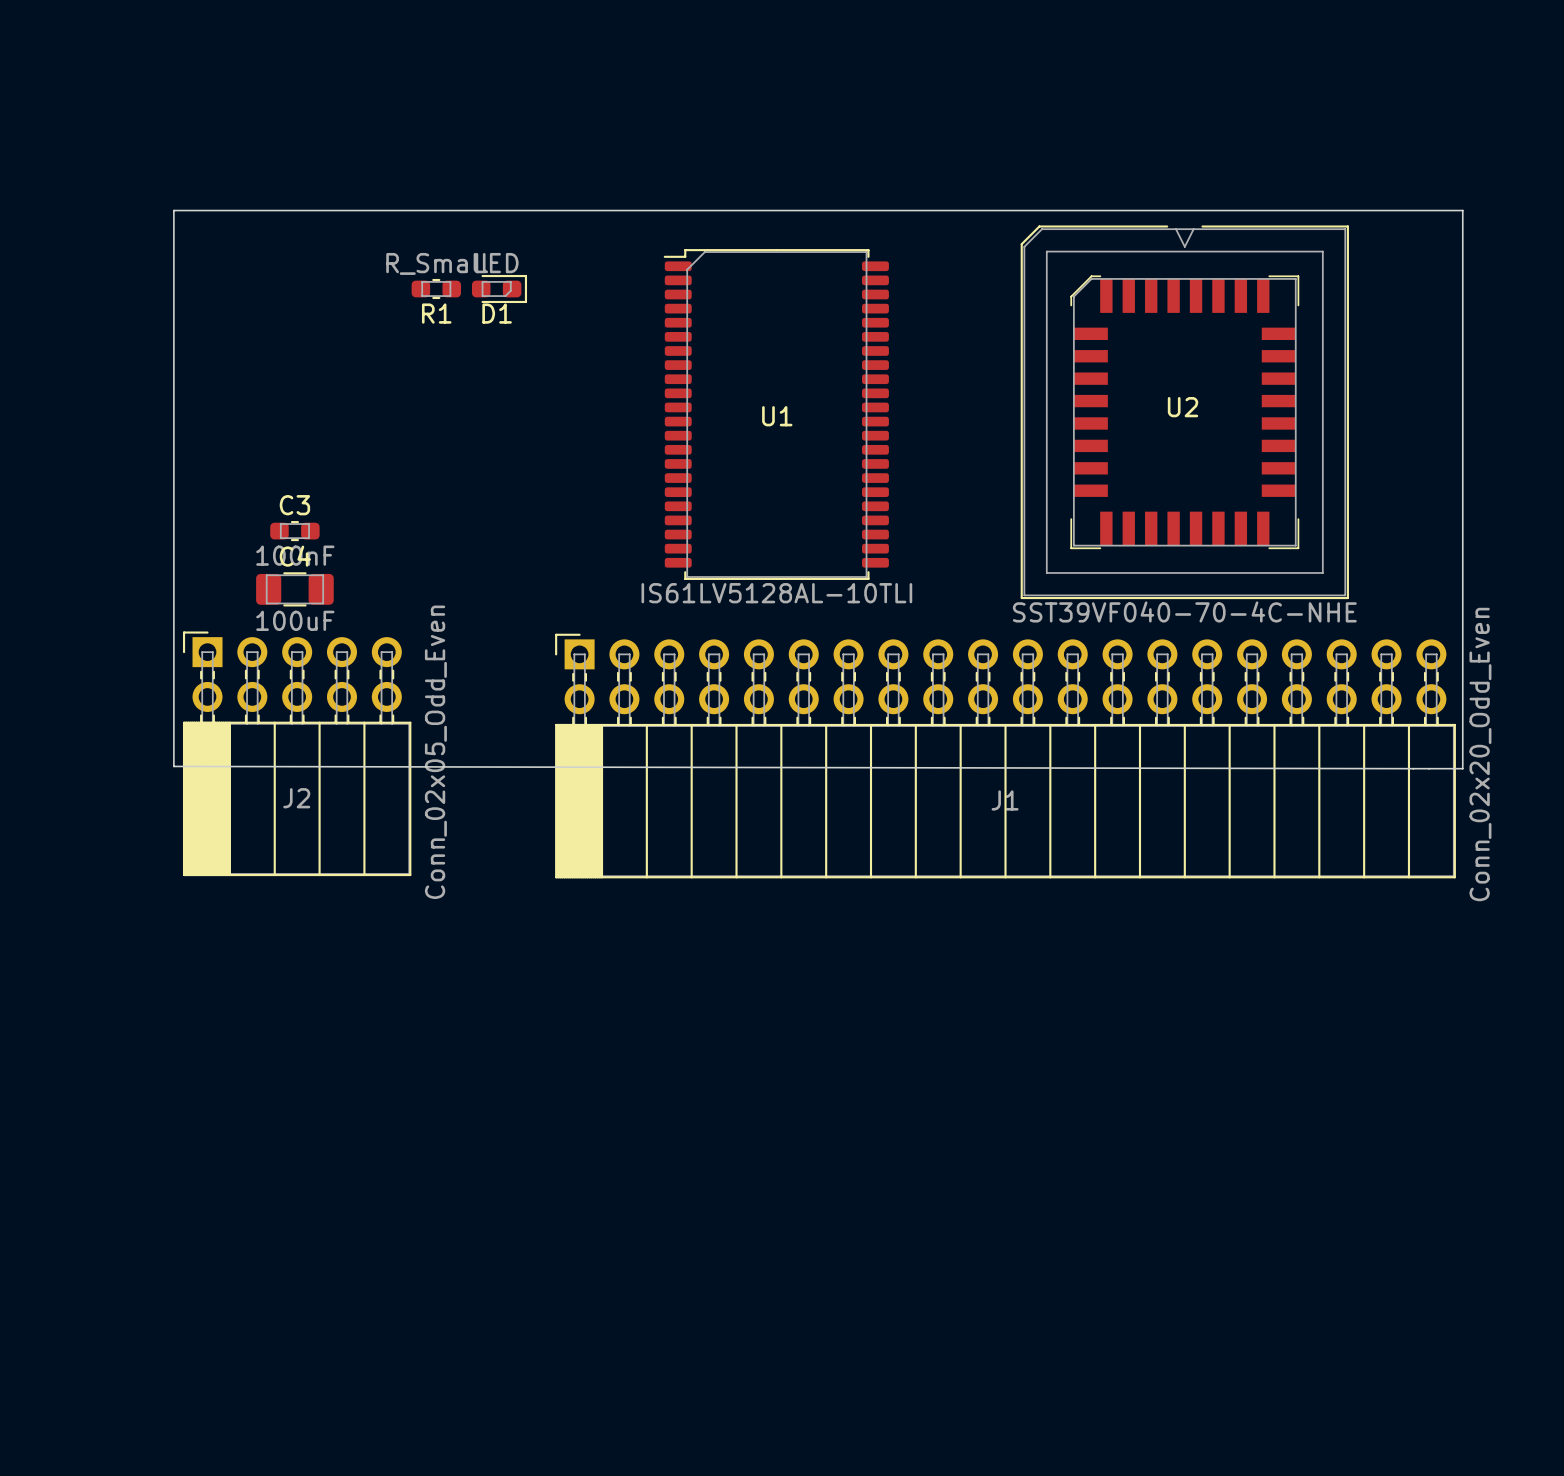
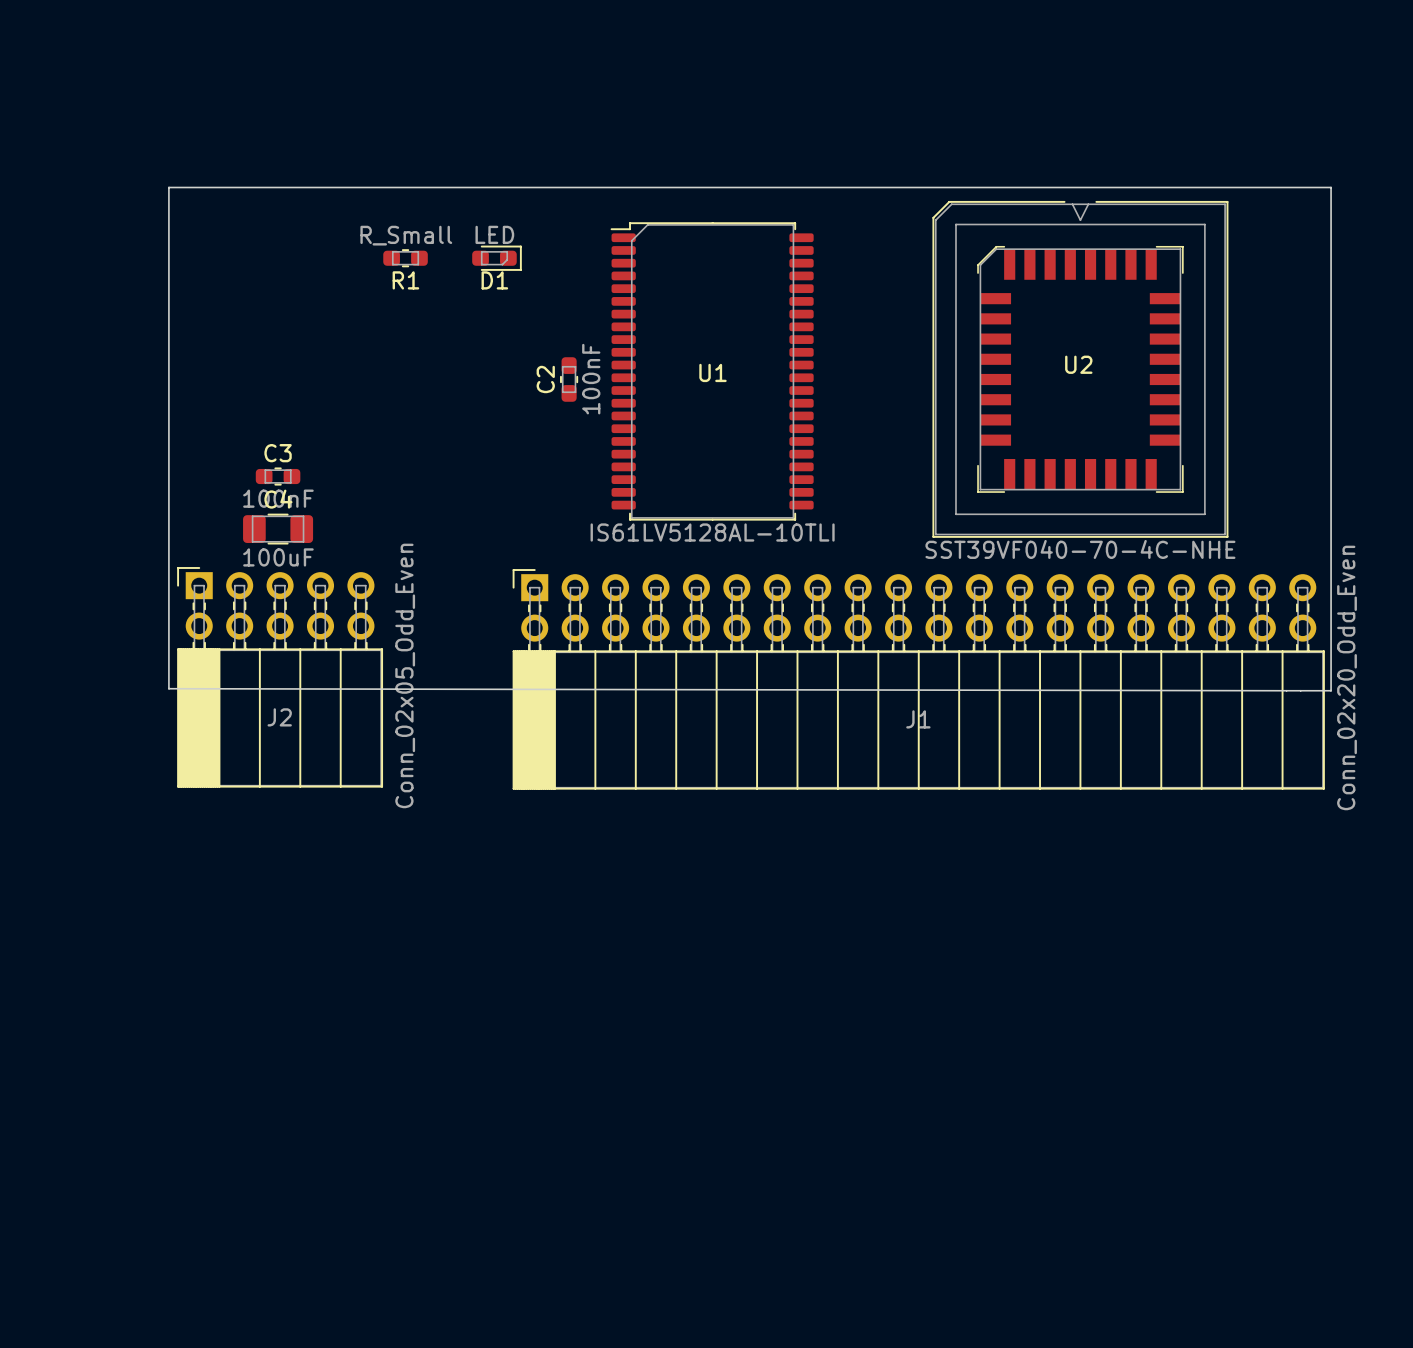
D1 position: (499, 288) -> (497, 258)
C2: none -> 100nF (569, 379)

